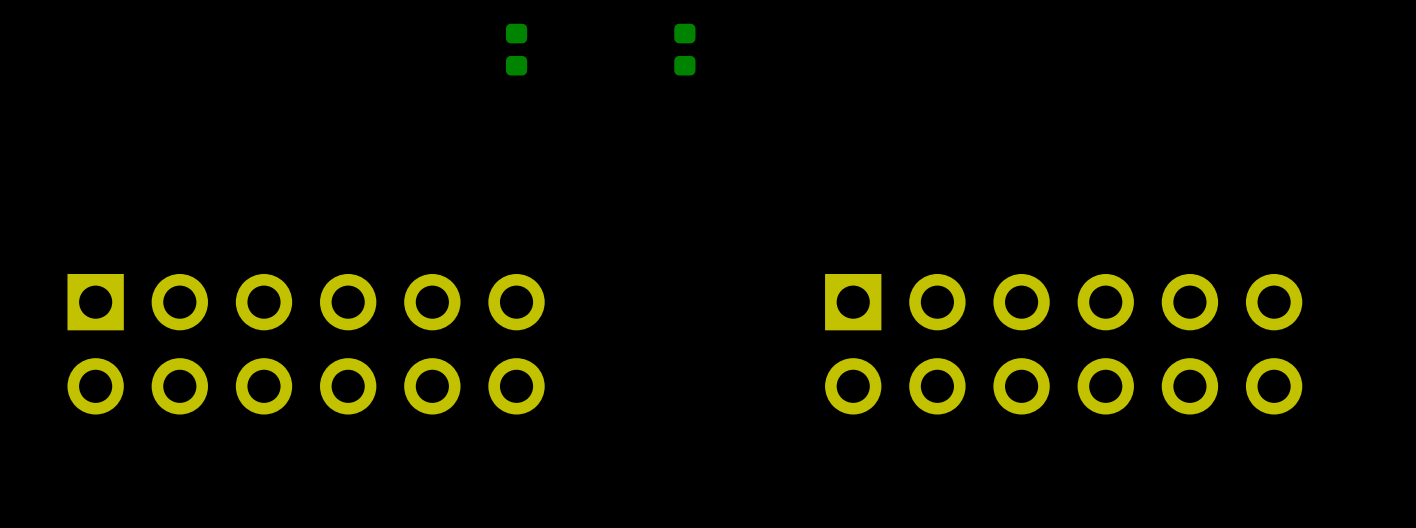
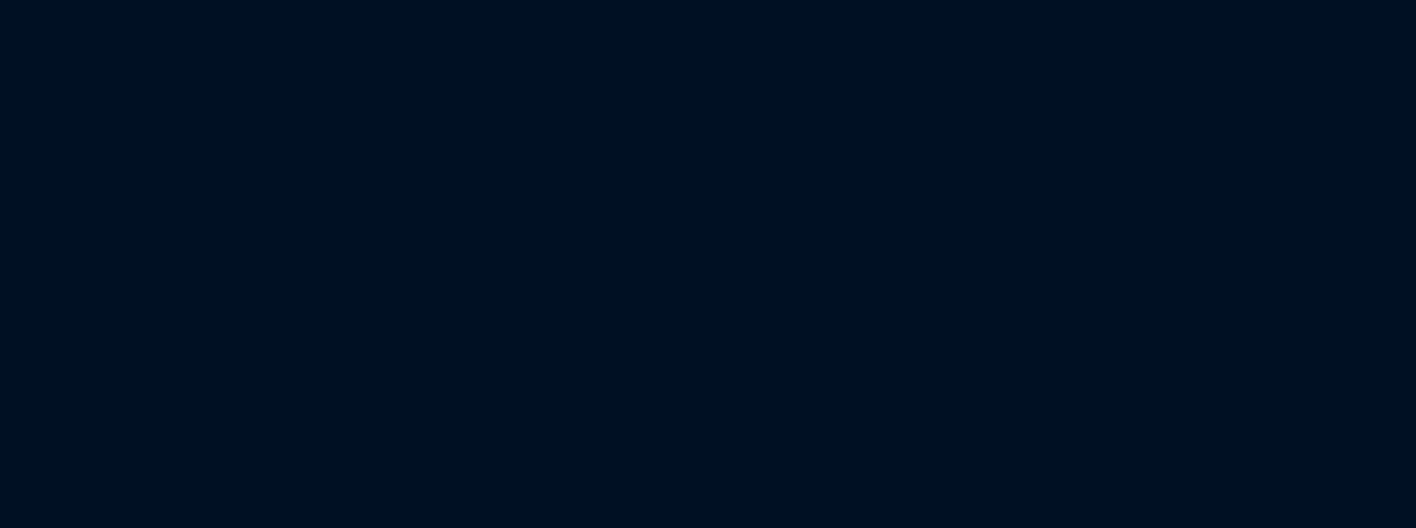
part: (516, 49) -> none
part: (684, 49) -> none
part: (306, 344) -> none
part: (1063, 344) -> none

